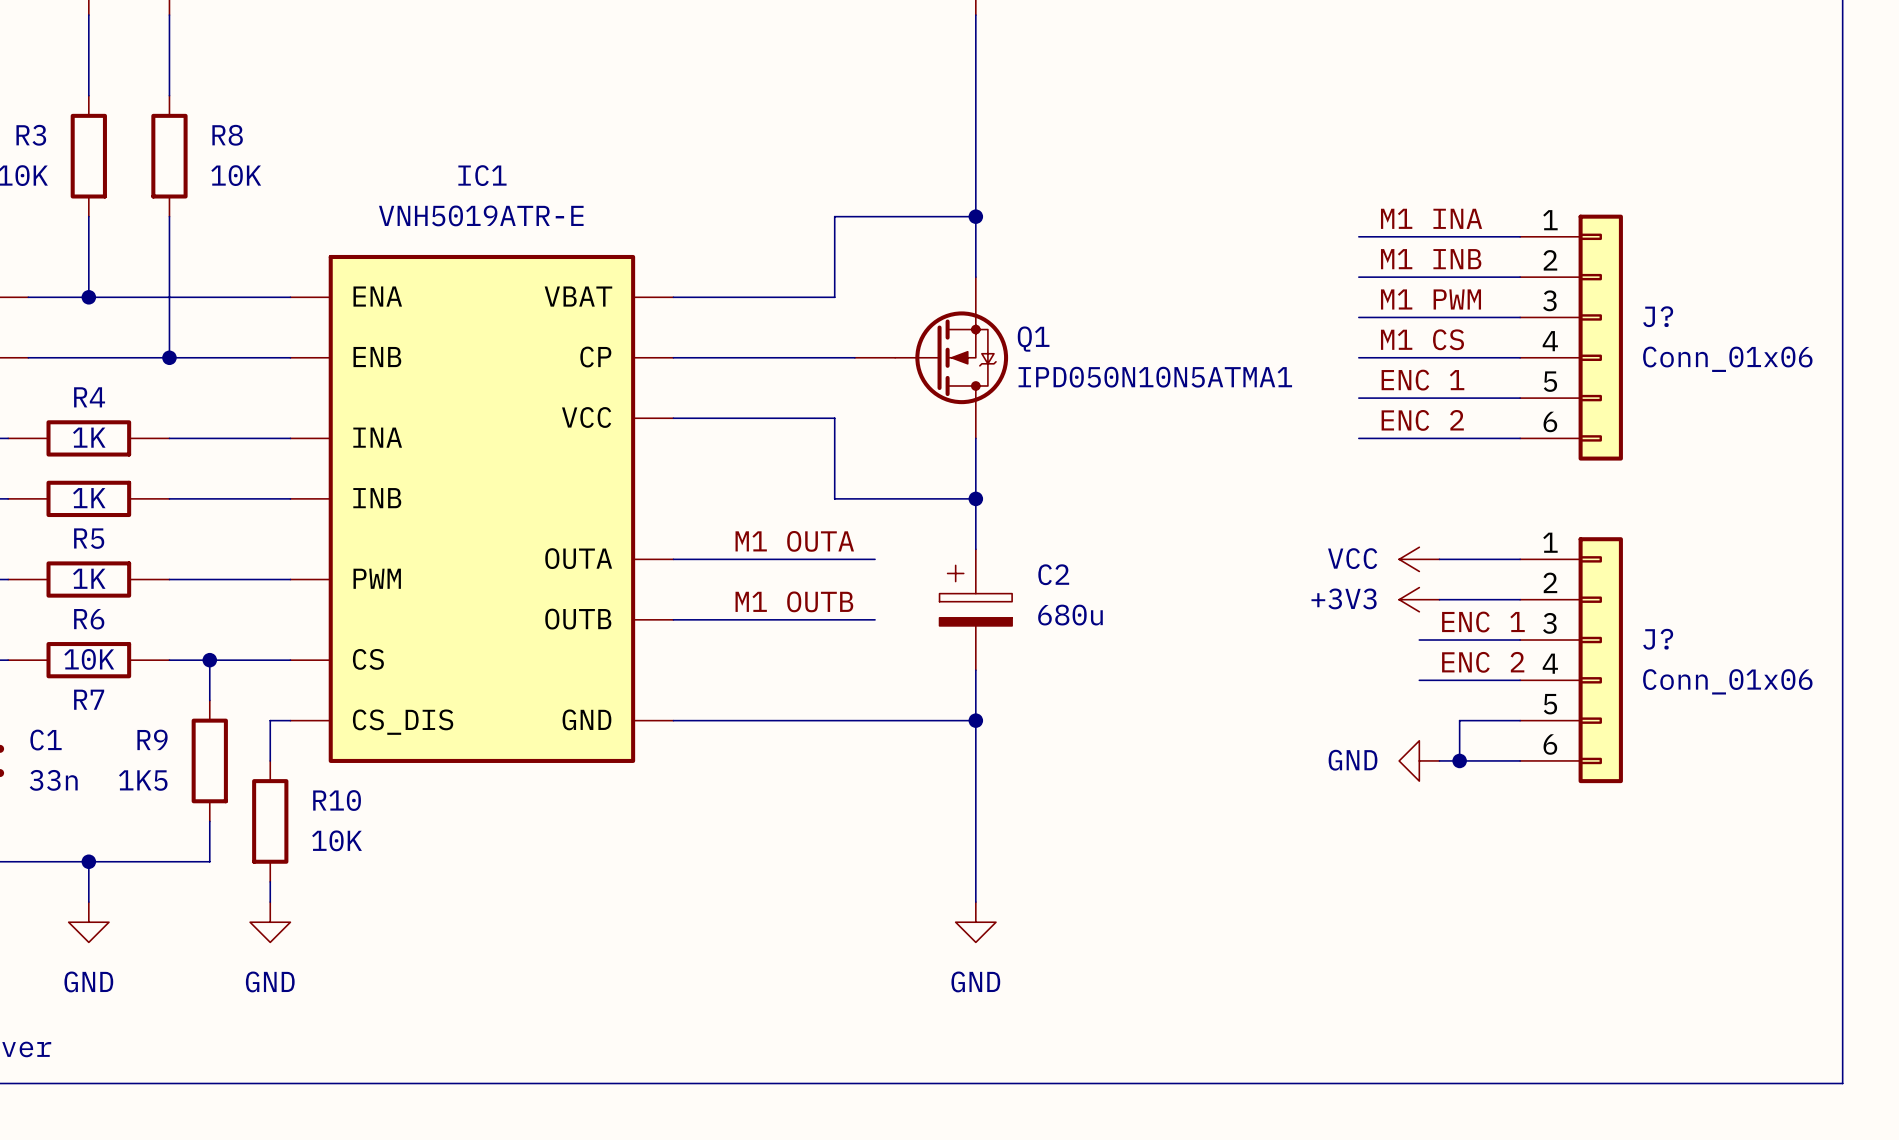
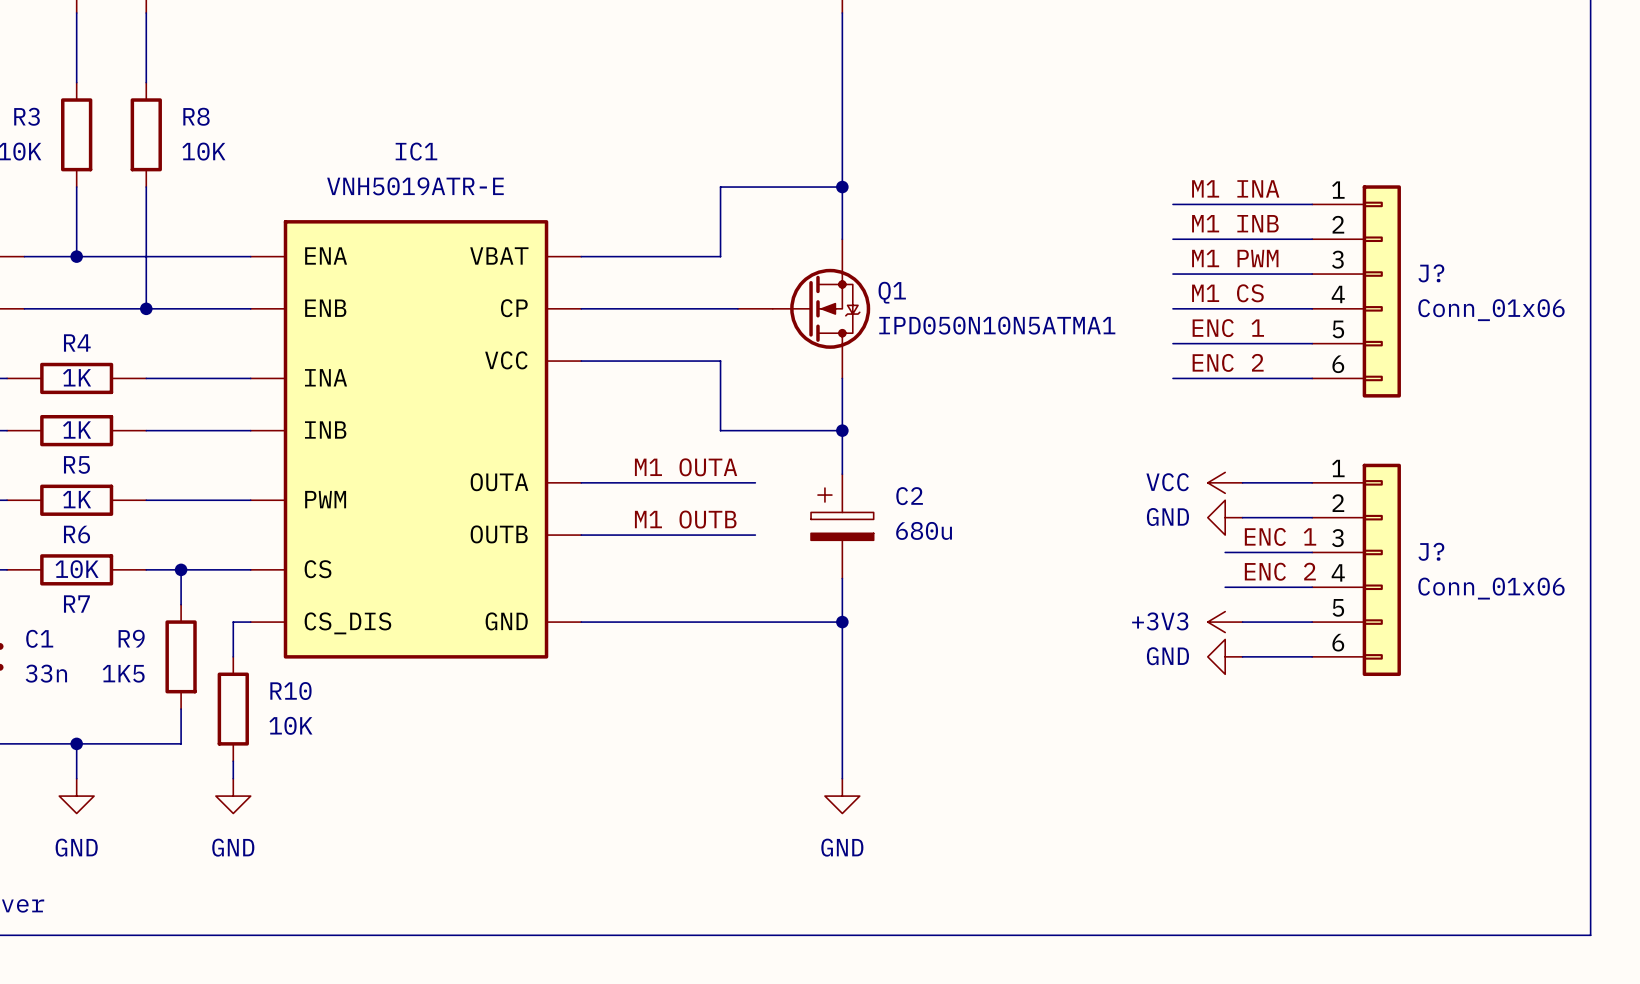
power symbol: +3V3 (1419, 599) -> GND (1225, 517)
power symbol: none -> +3V3 (1225, 622)
wire: (1459, 720) (1459, 760) -> (1259, 622) (1242, 622)
junction: (1459, 760) -> none

